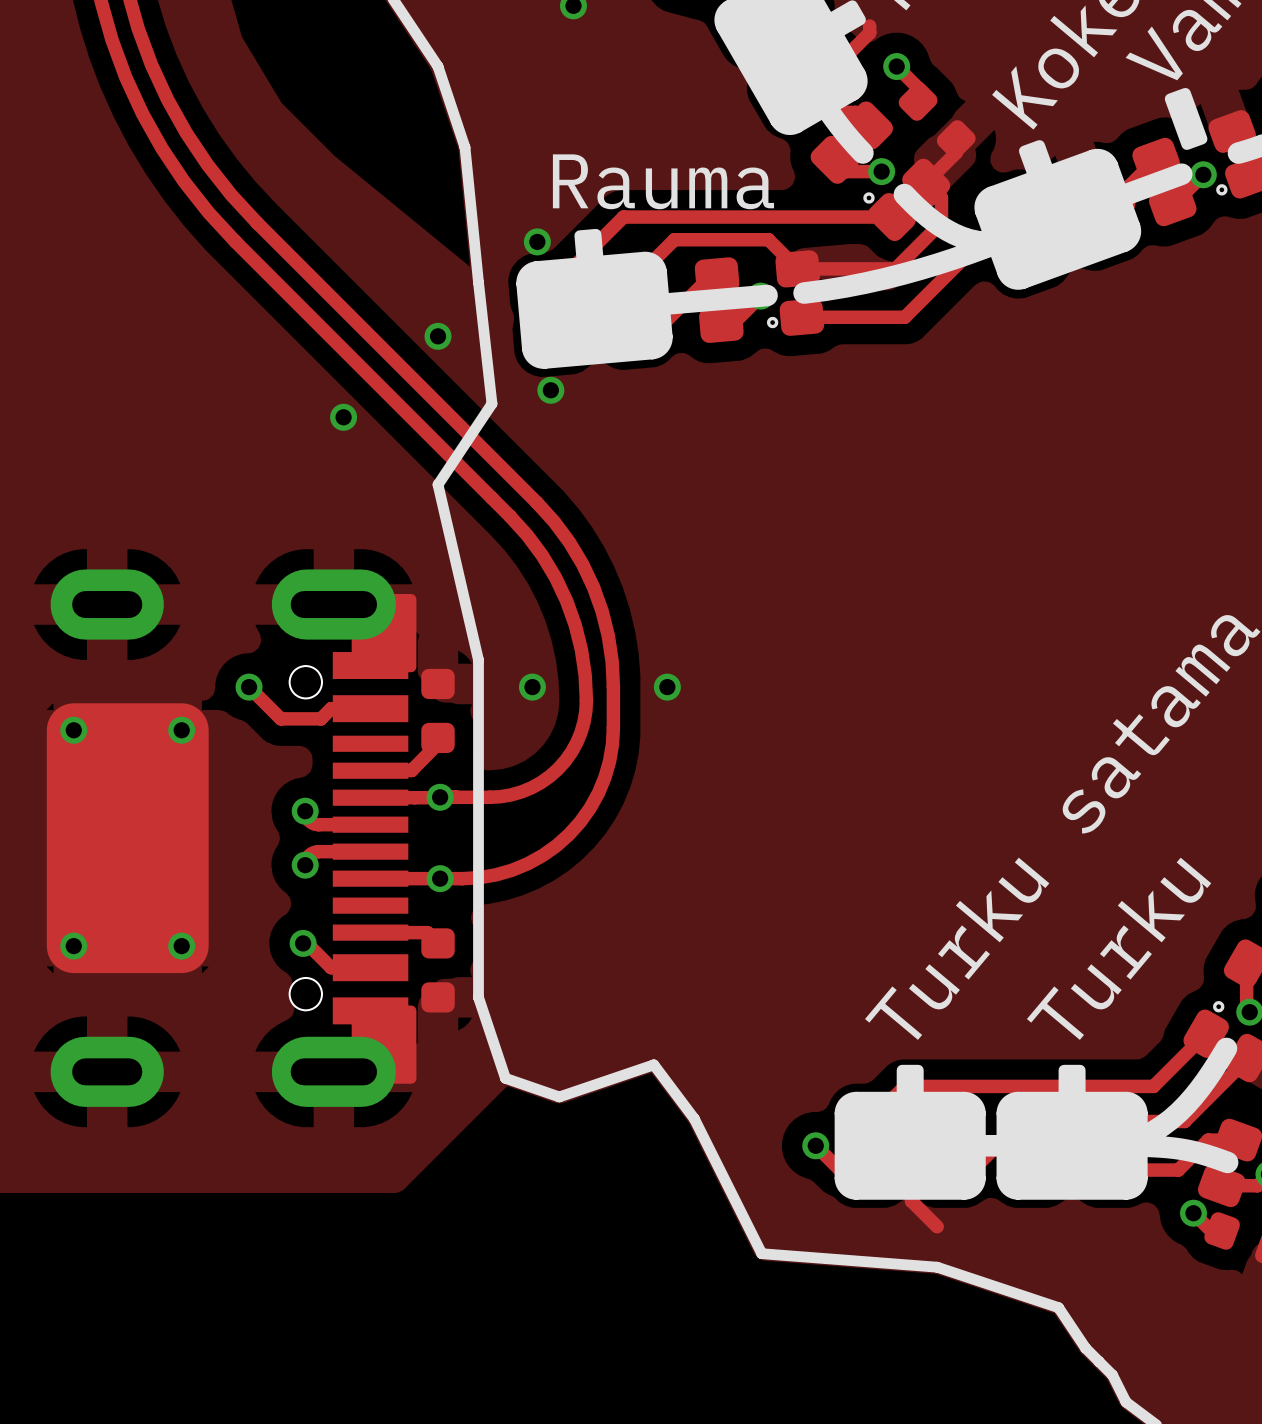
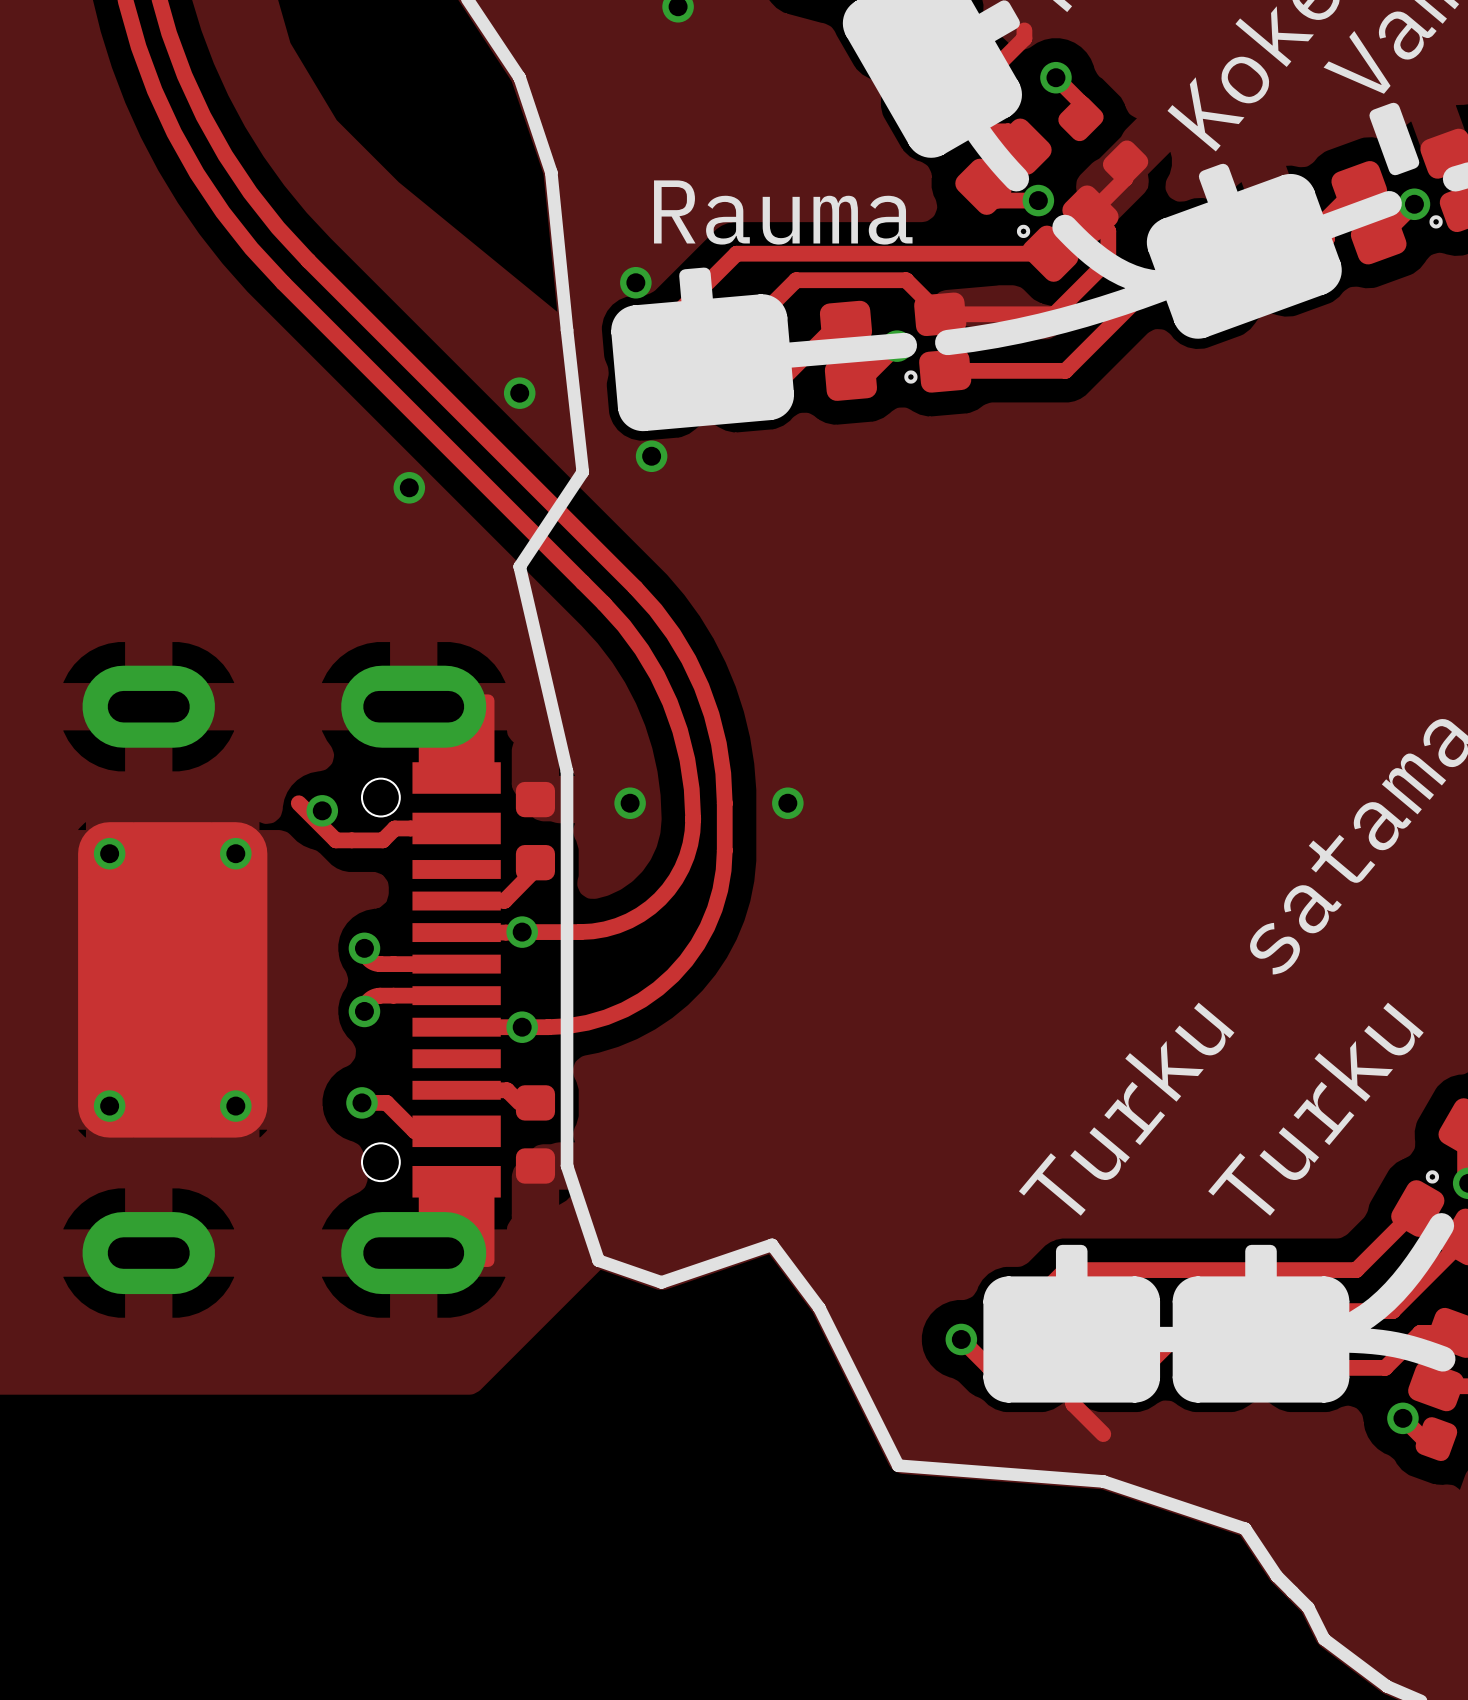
via position: (249, 687) -> (322, 810)
part position: (437, 710) -> (535, 831)
track: (439, 742) (411, 770) -> (537, 867) (504, 900) (488, 900)
part position: (227, 838) -> (289, 979)
track: (306, 943) (331, 967) (348, 967) -> (366, 1102) (386, 1102) (414, 1131)
part position: (438, 970) -> (535, 1134)

